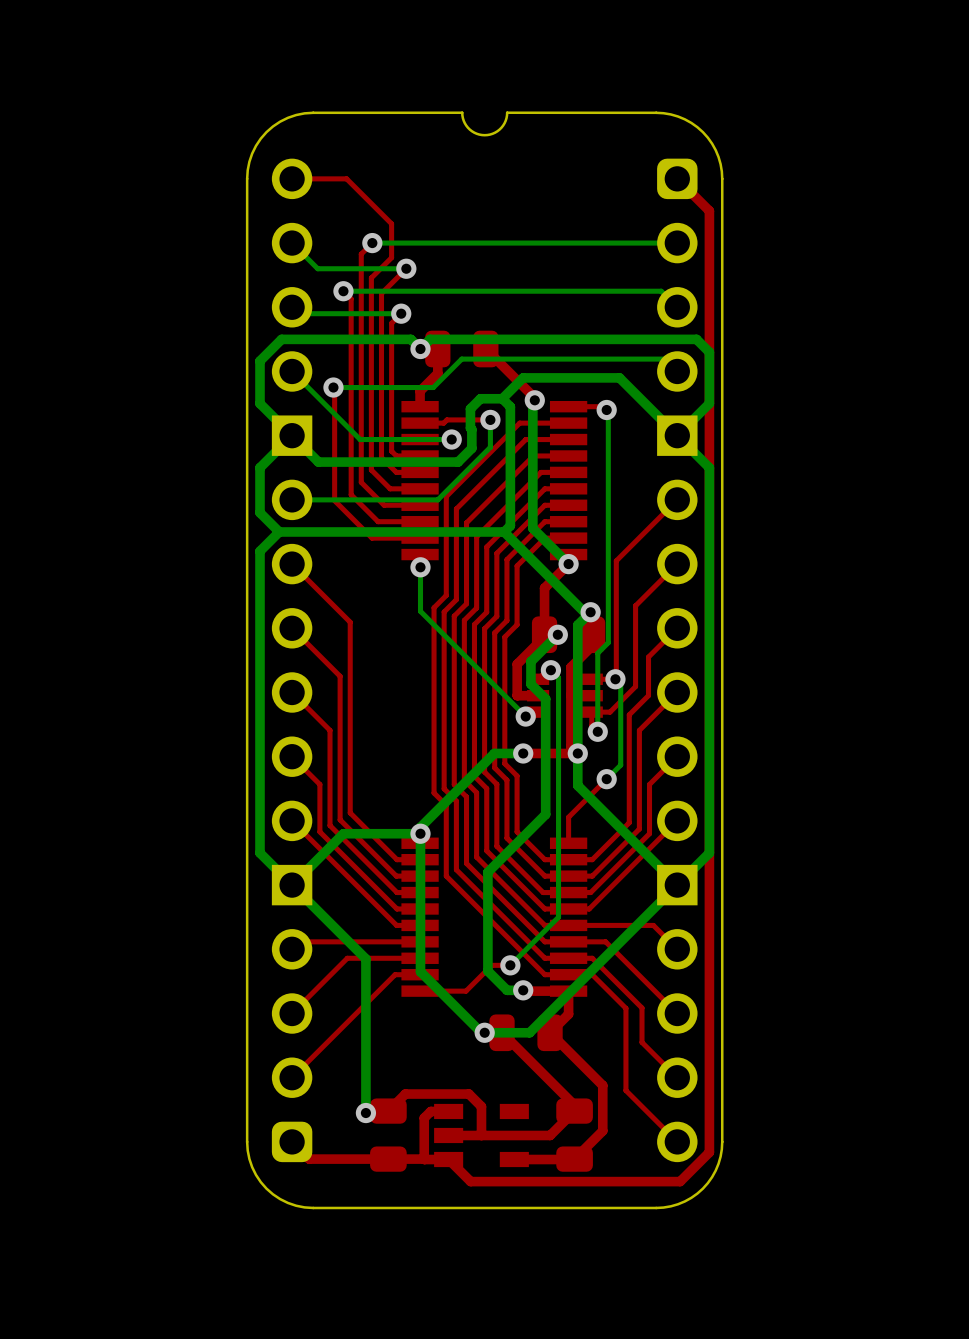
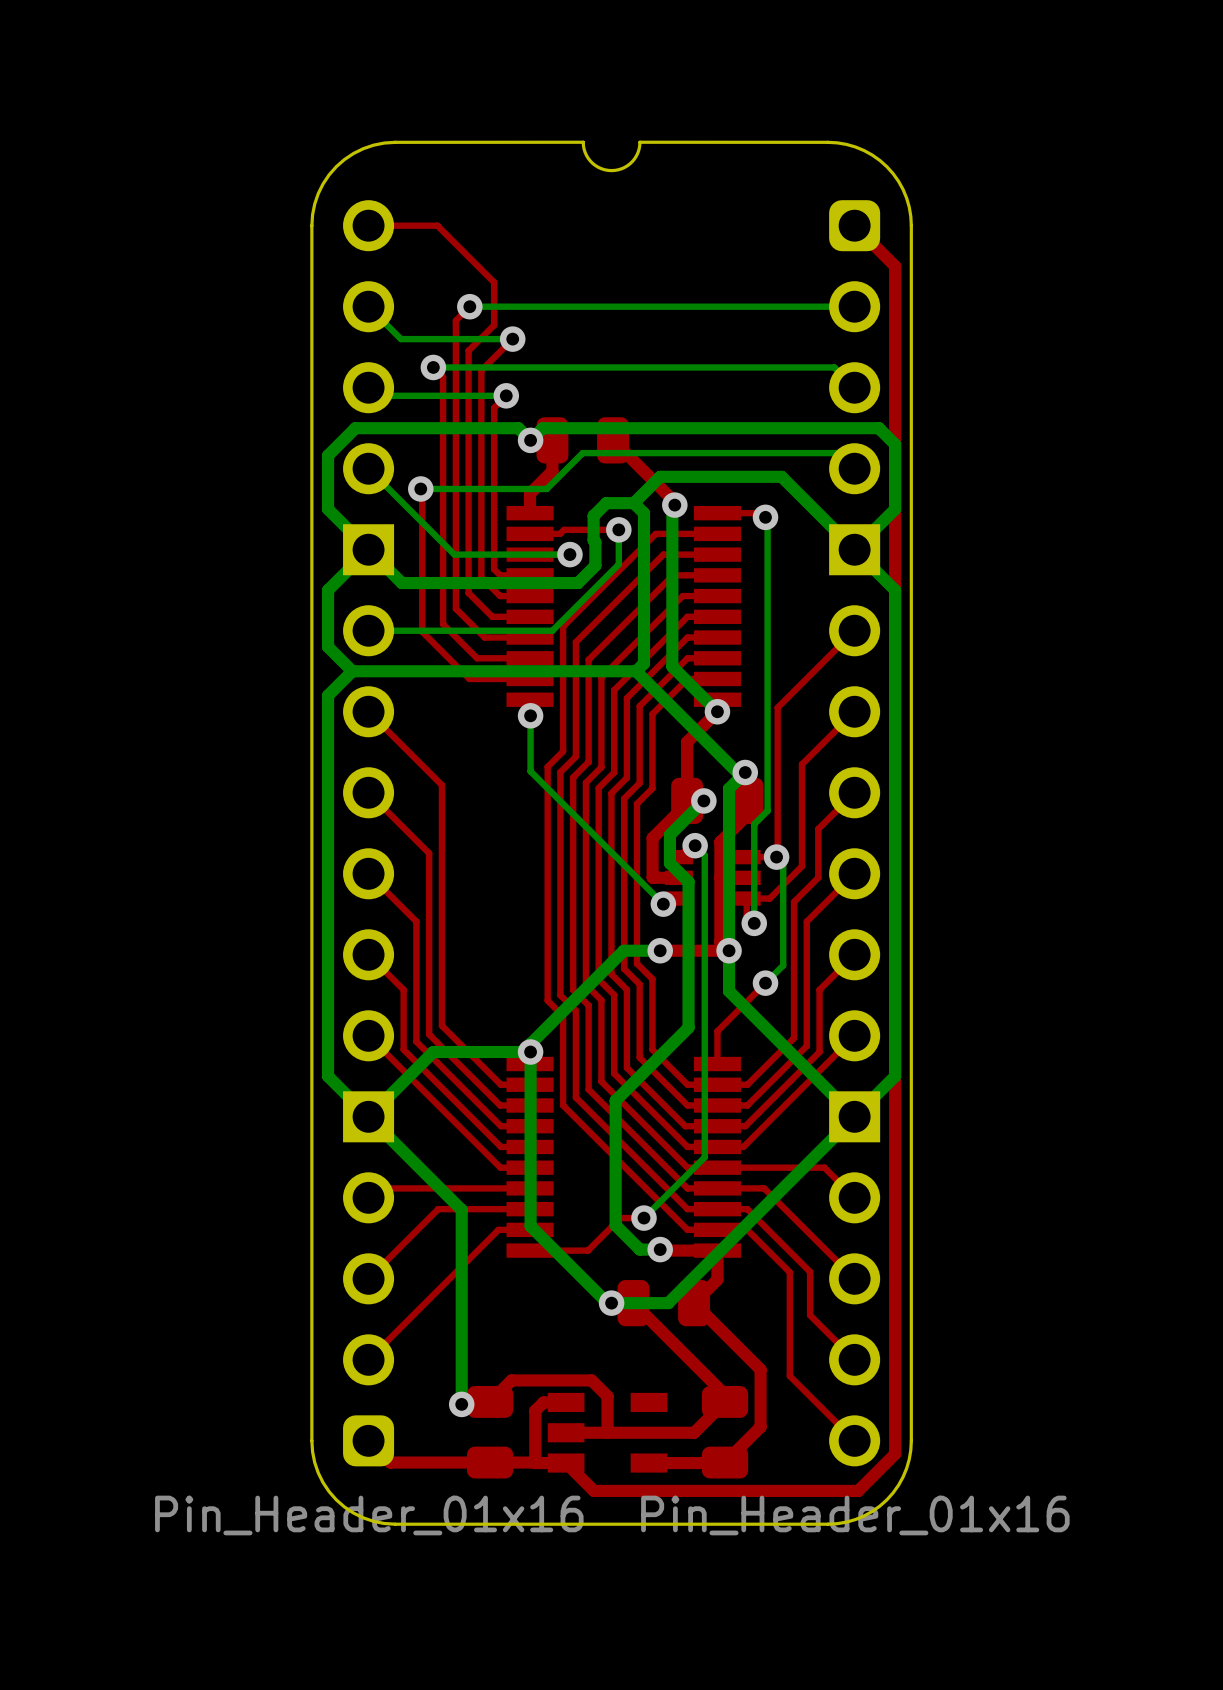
drawing: none -> [155, 1495, 1070, 1536]

